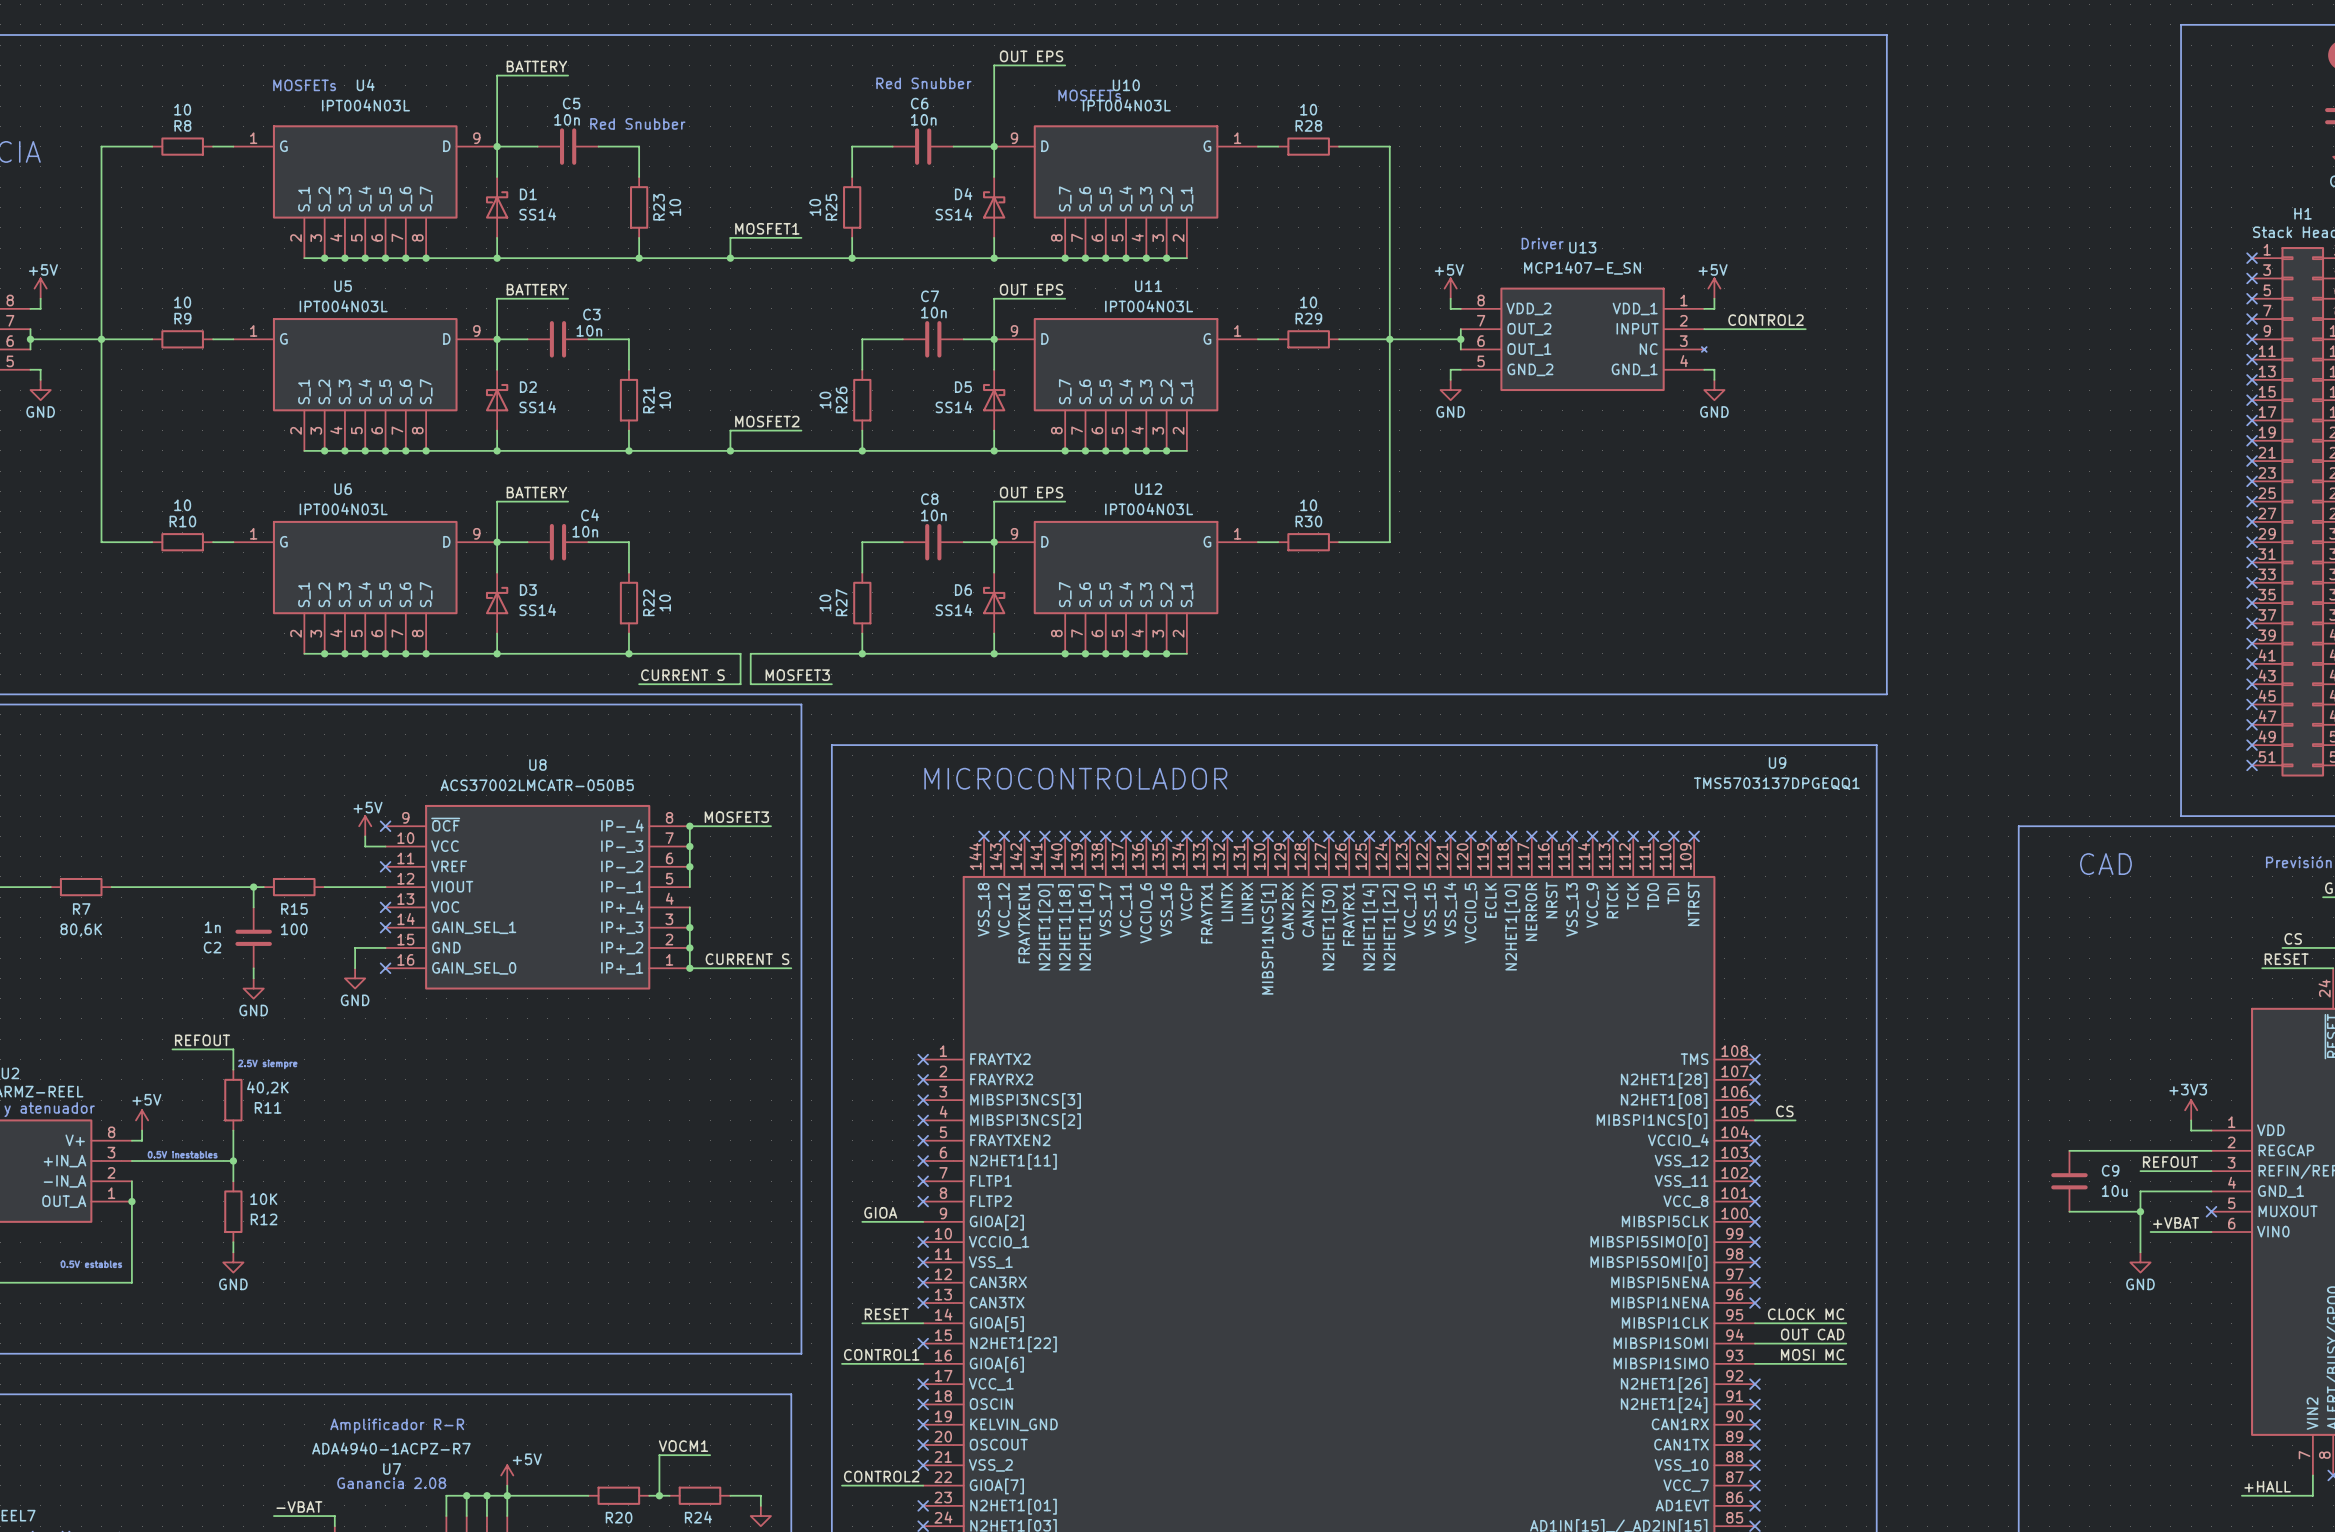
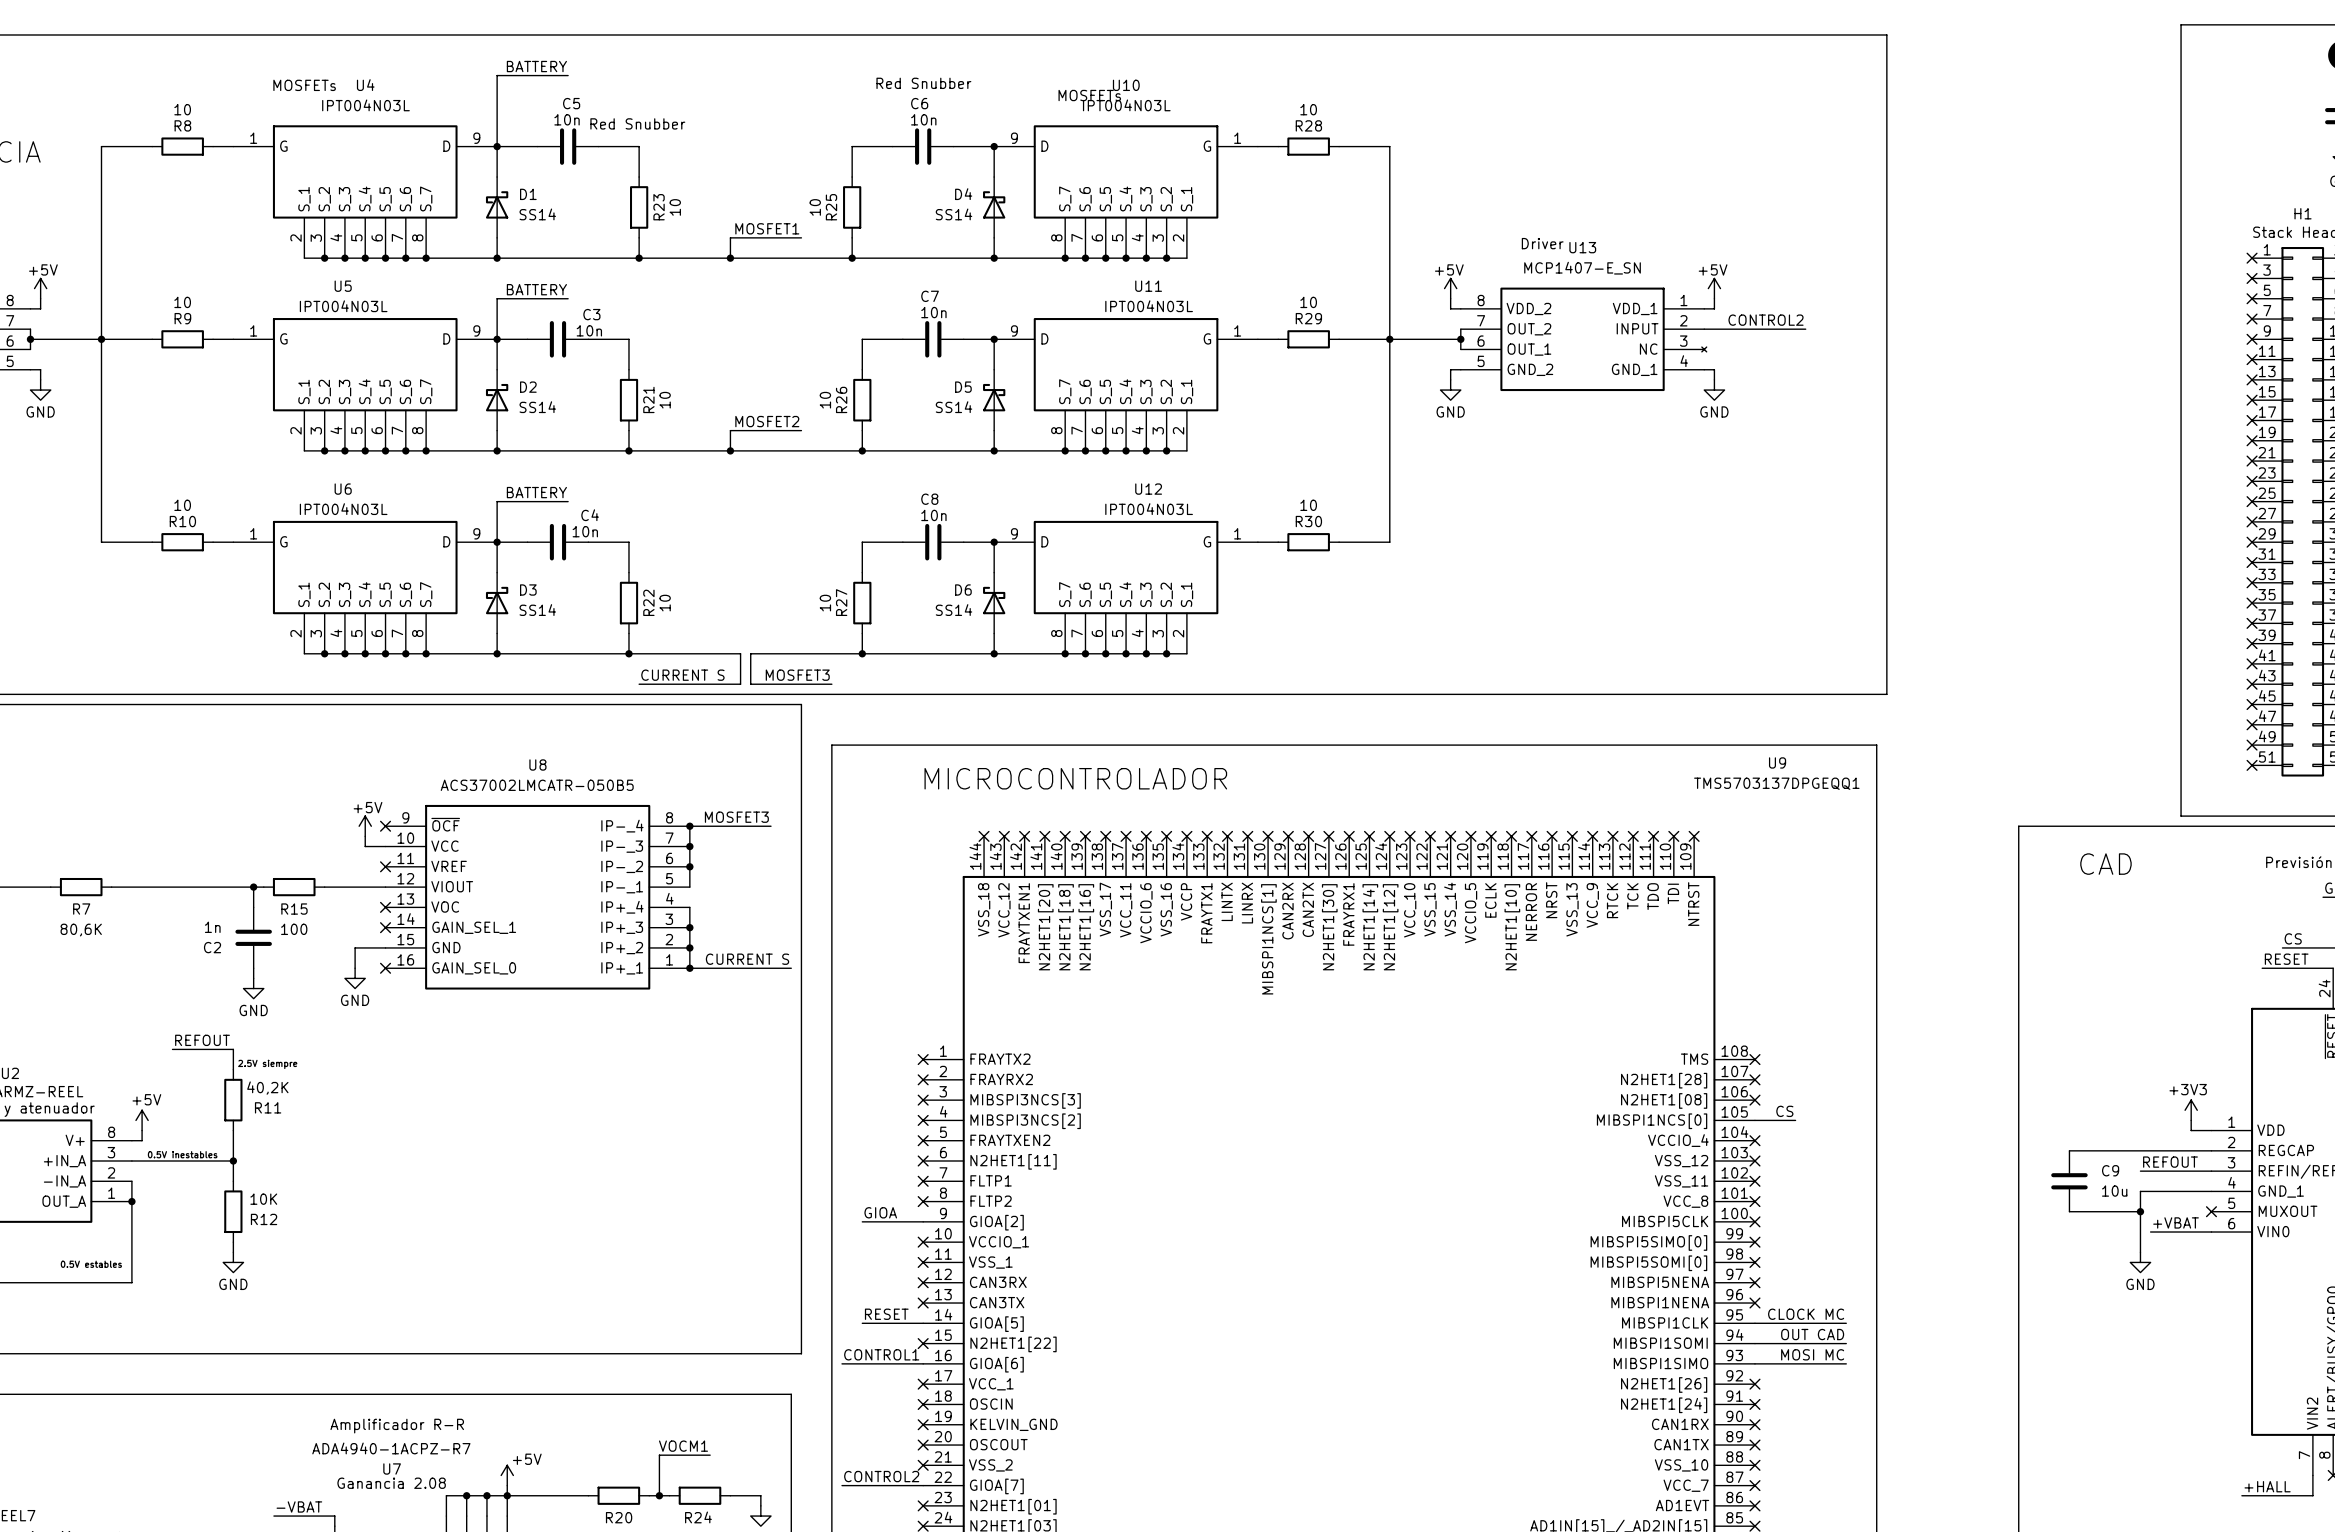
label: OUT EPS (1031, 56) -> none
wire: (1065, 65) (994, 65) (994, 146) -> none
label: OUT EPS (1031, 289) -> none
wire: (1065, 298) (994, 298) (994, 339) -> none
label: OUT EPS (1031, 492) -> none
wire: (1065, 501) (994, 501) (994, 542) -> none

